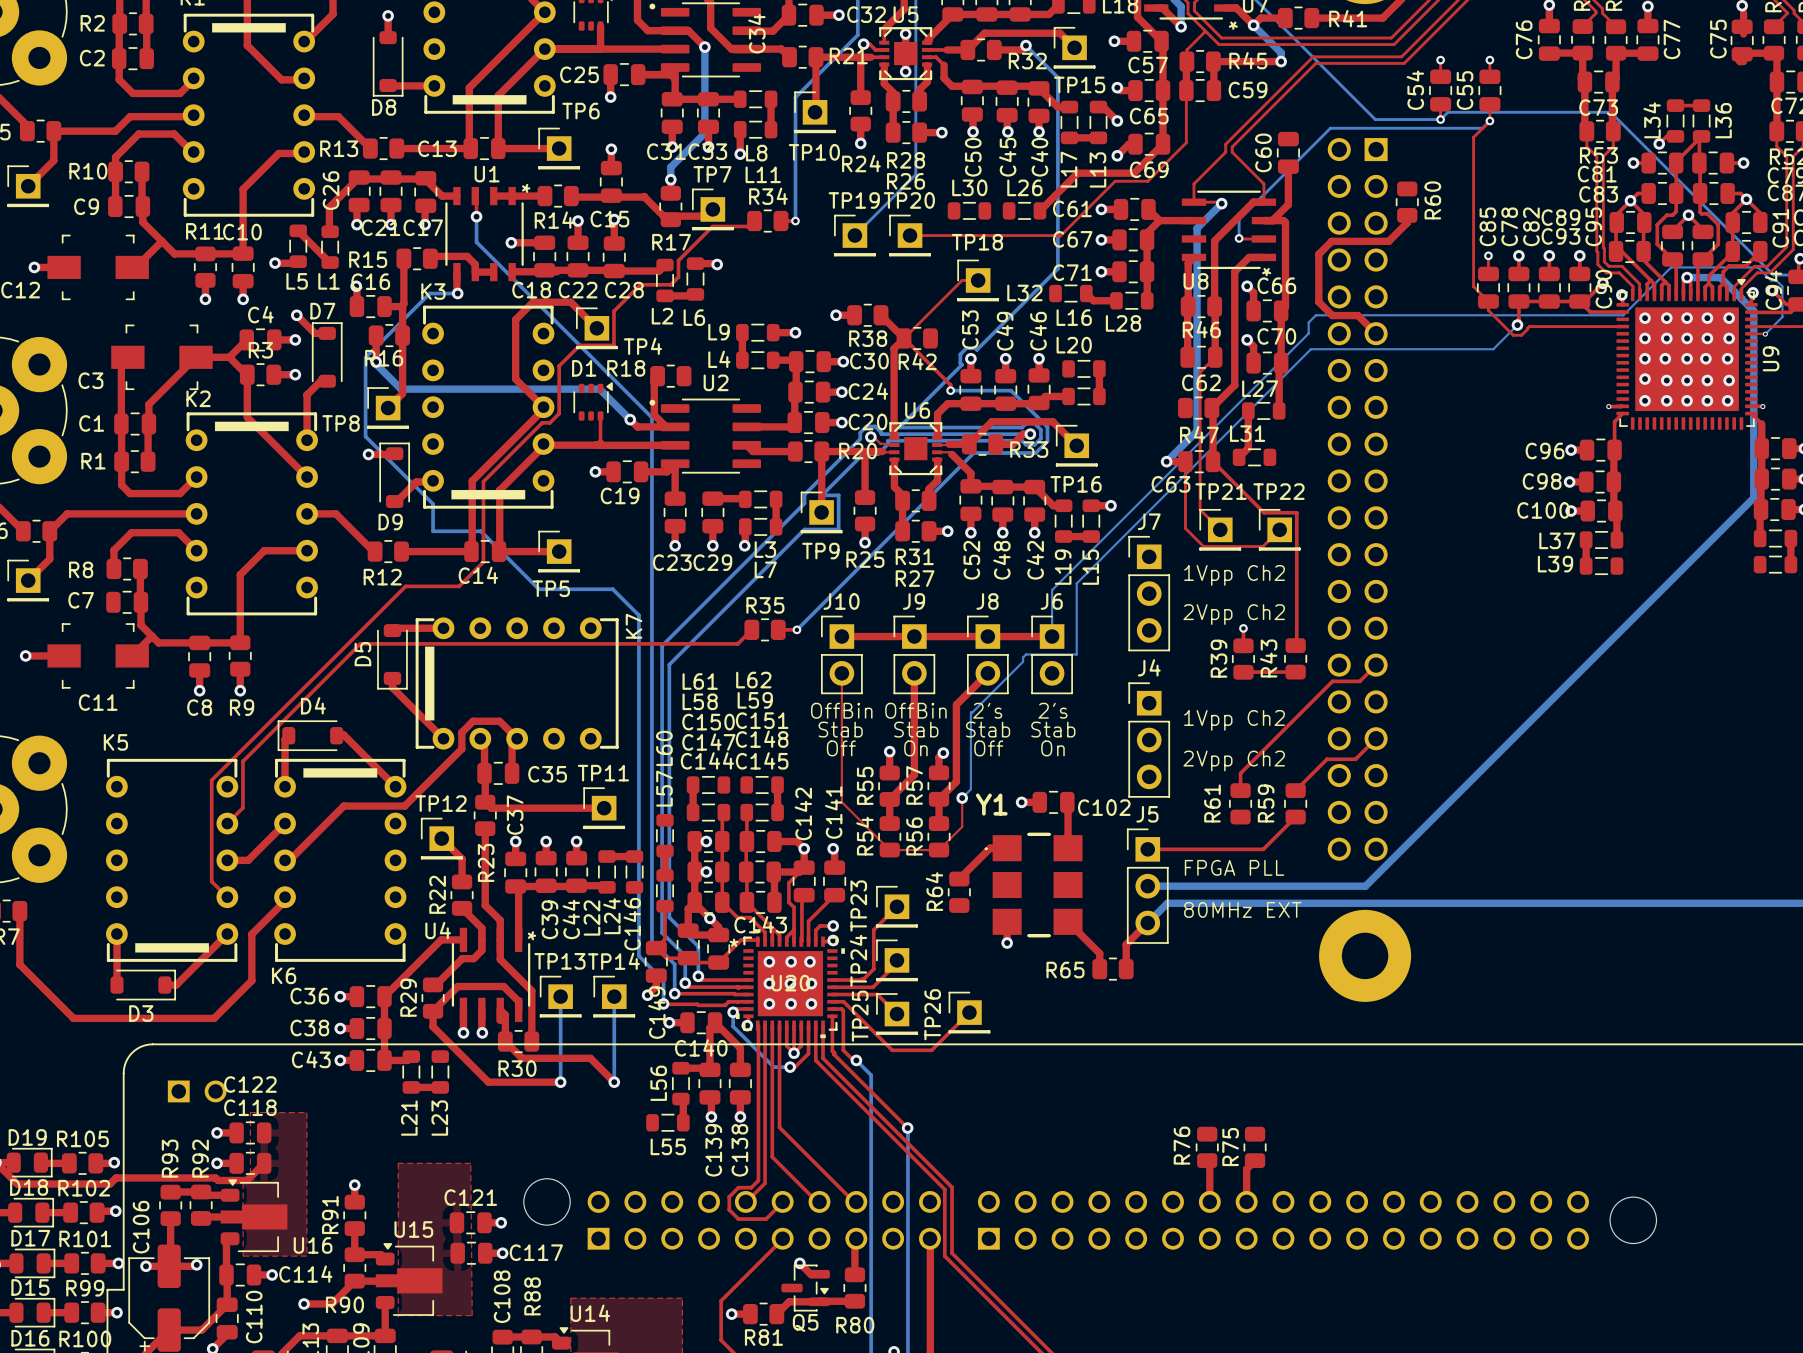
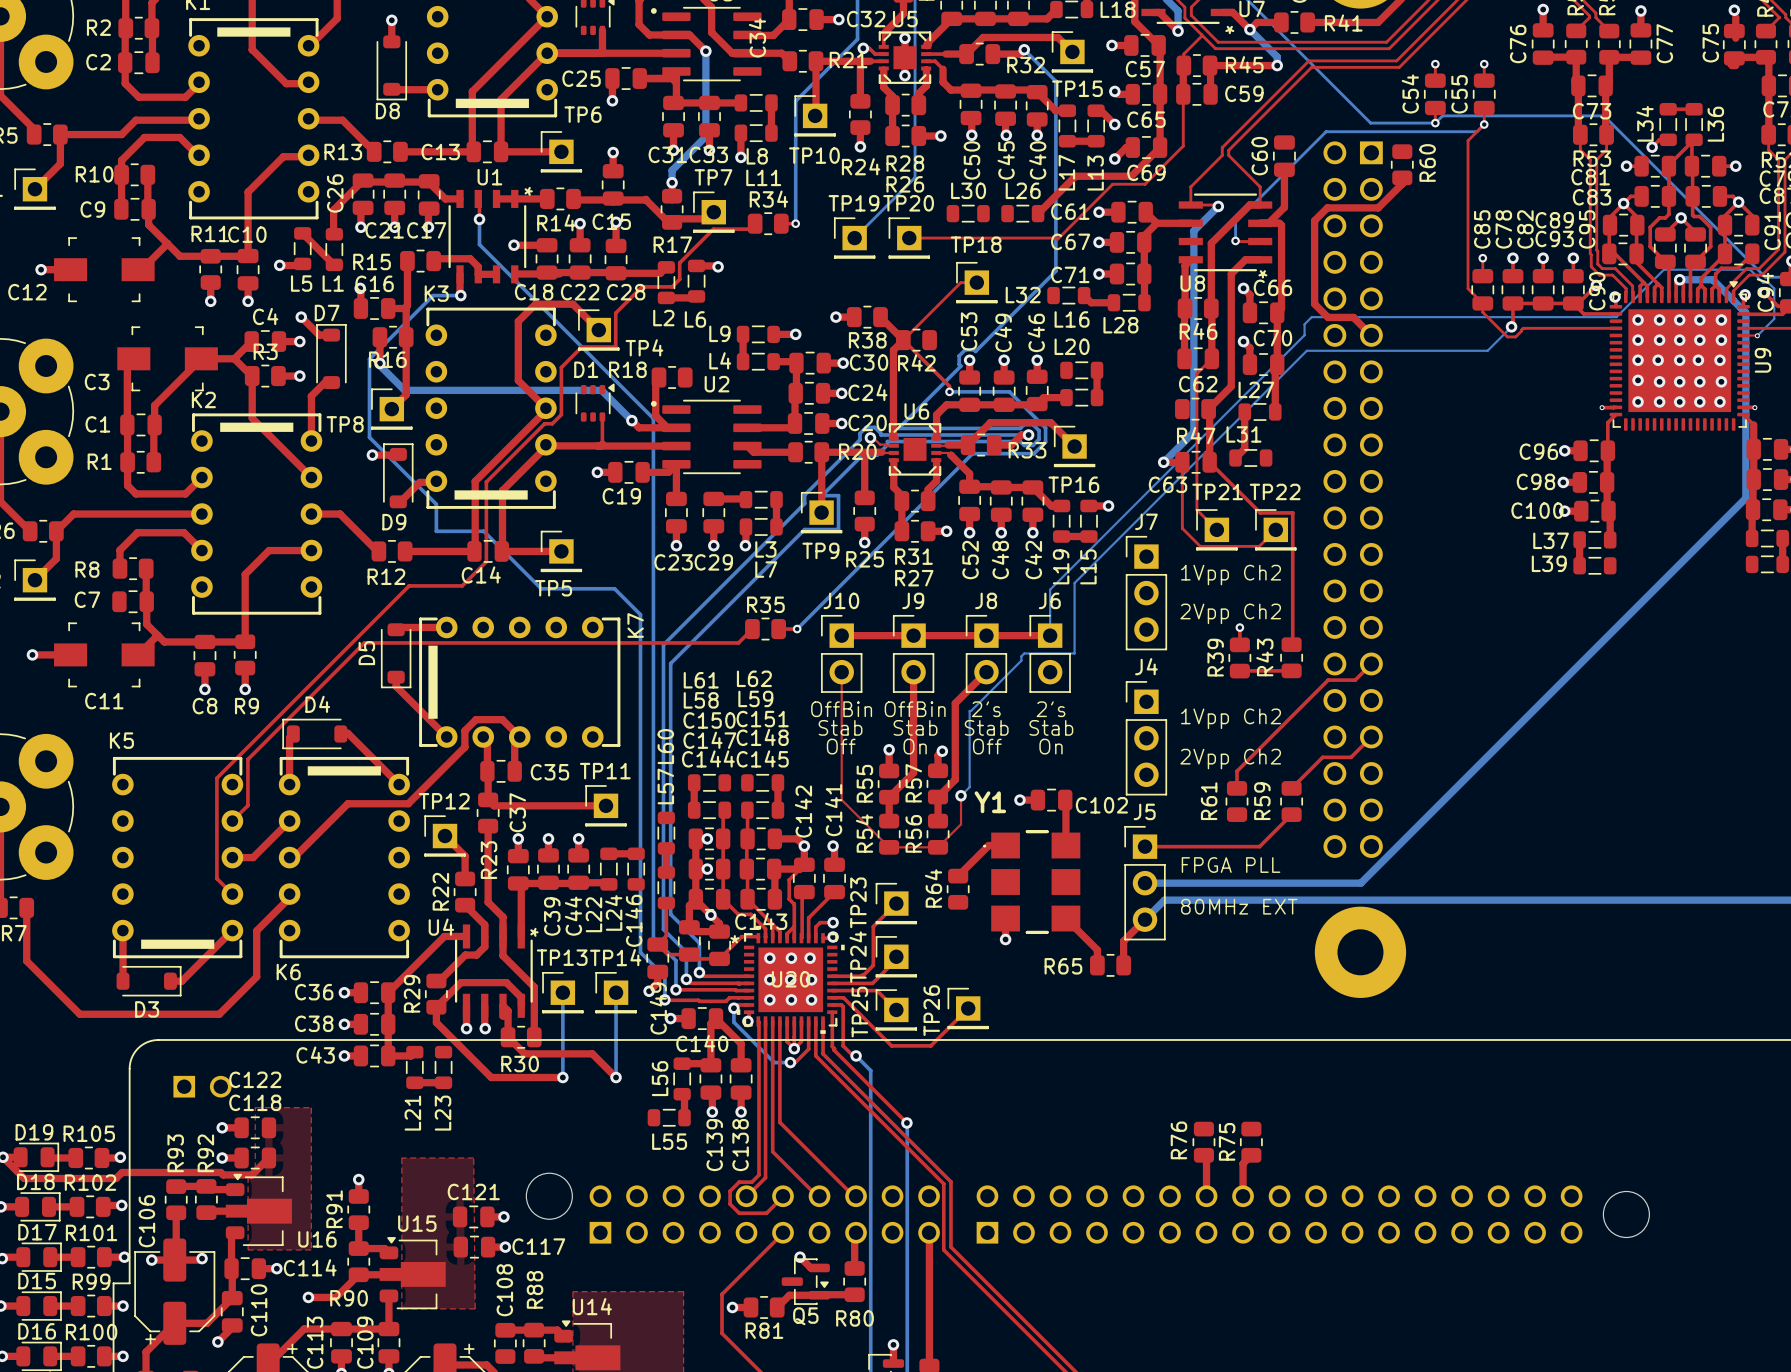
R60 position: (1407, 202) -> (1402, 164)
top track: (1407, 215) (1407, 222) (1388, 241) (1331, 241) (1318, 254) -> (1402, 177) (1402, 183) (1378, 207) (1327, 207) (1314, 220) (1314, 256)

